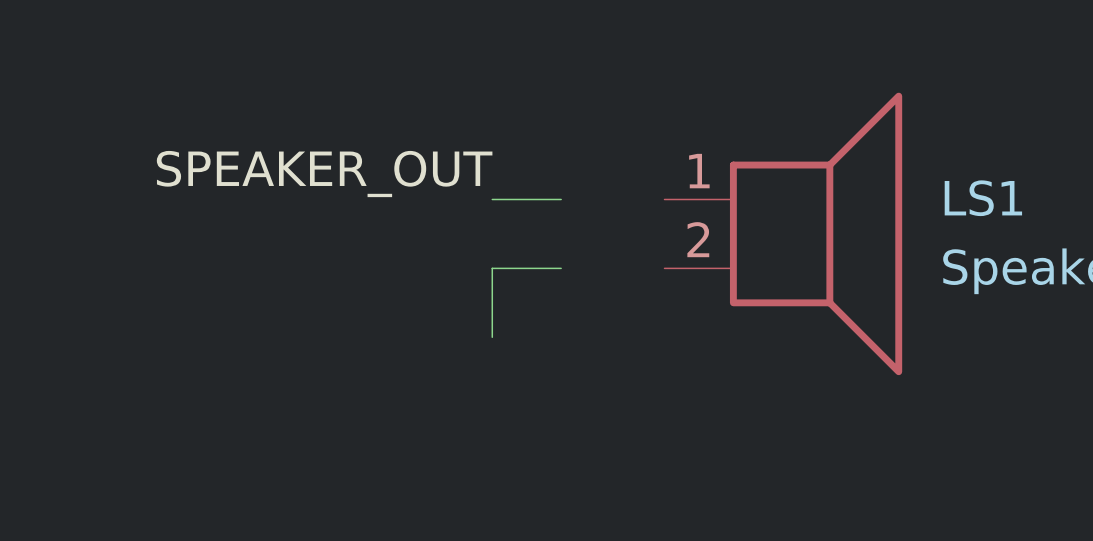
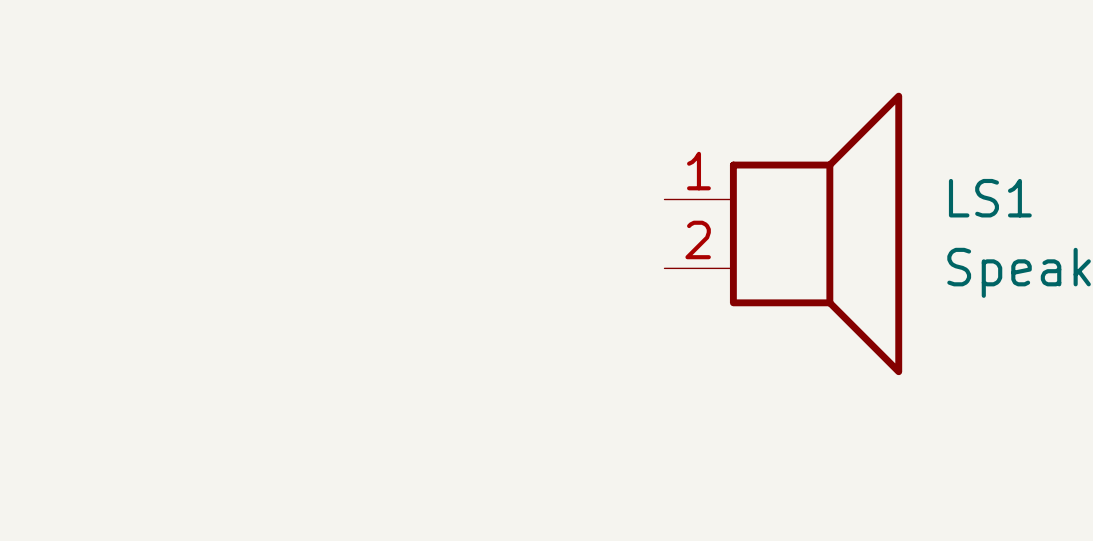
label: SPEAKER_OUT (324, 174) -> none
wire: (492, 199) (561, 199) -> none
wire: (561, 268) (492, 268) (492, 337) -> none

